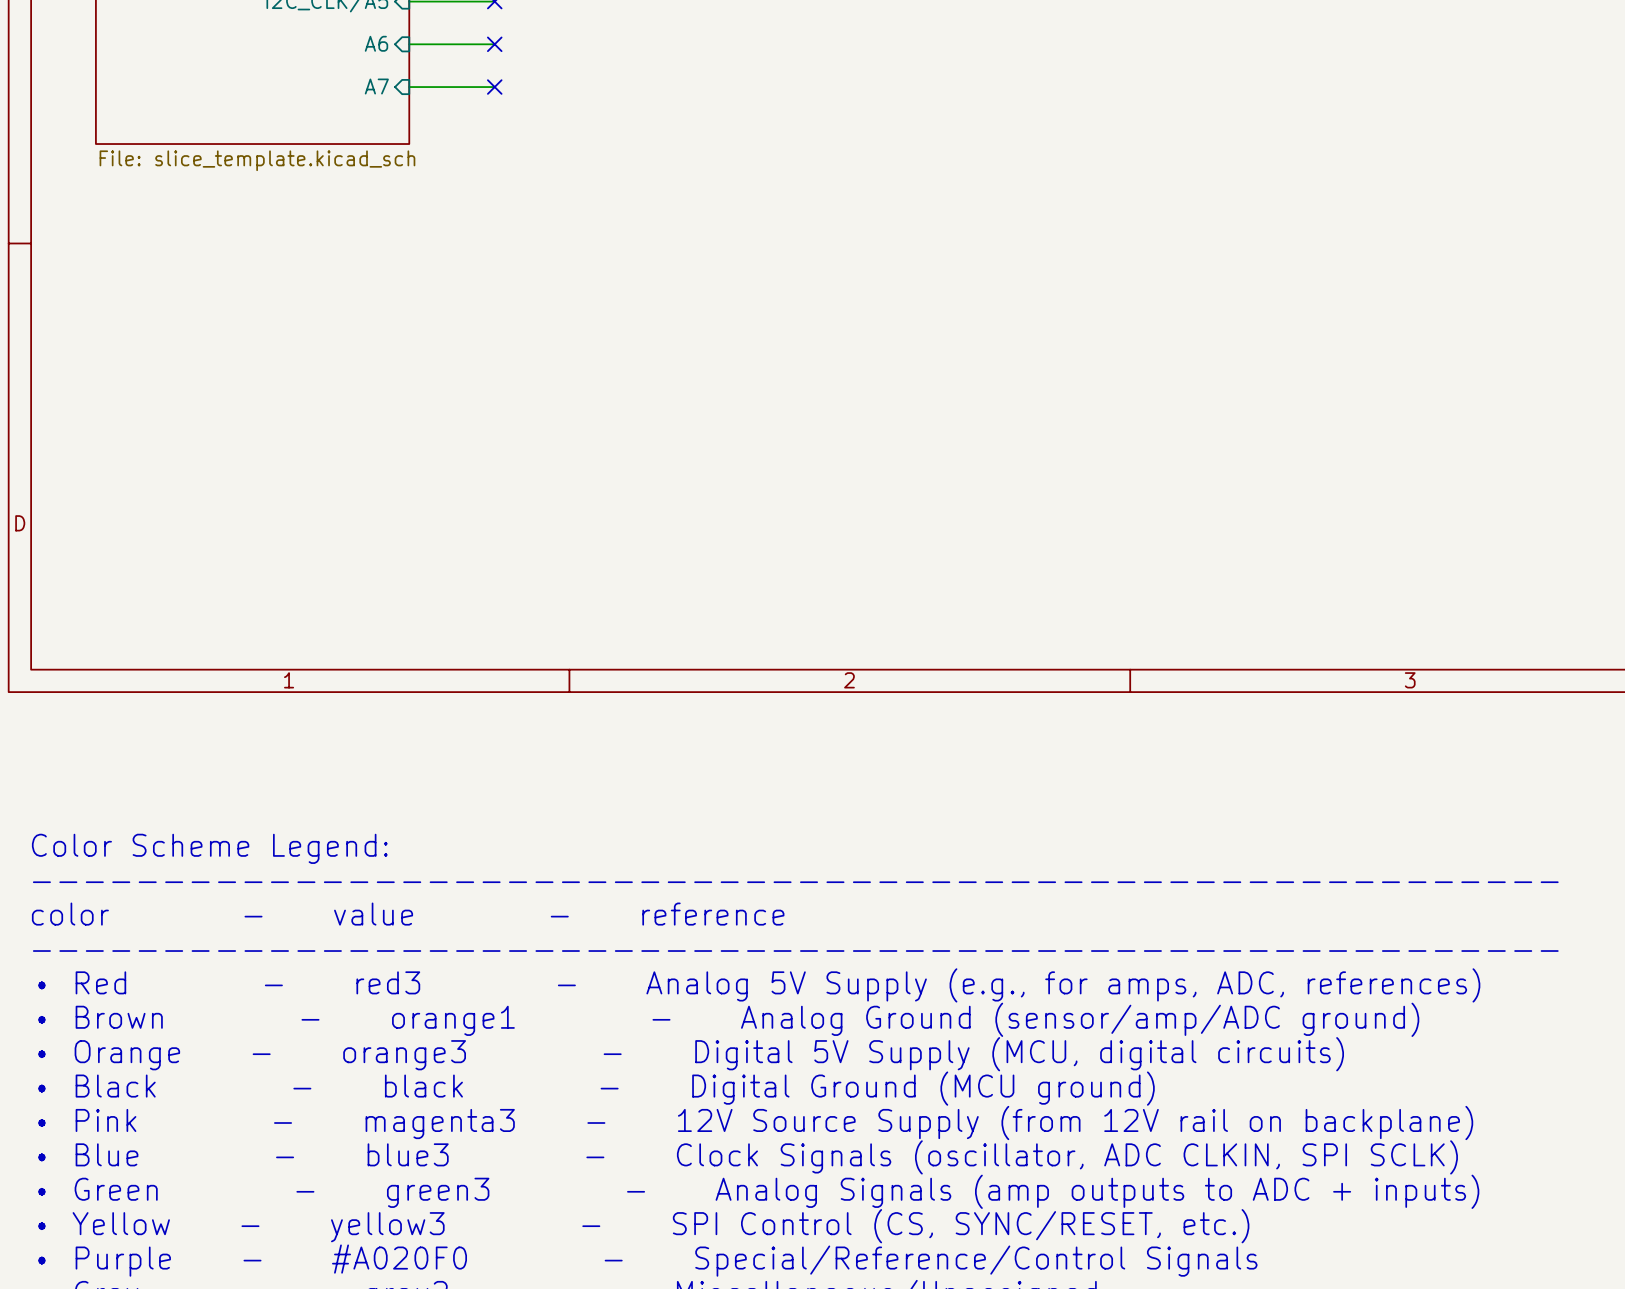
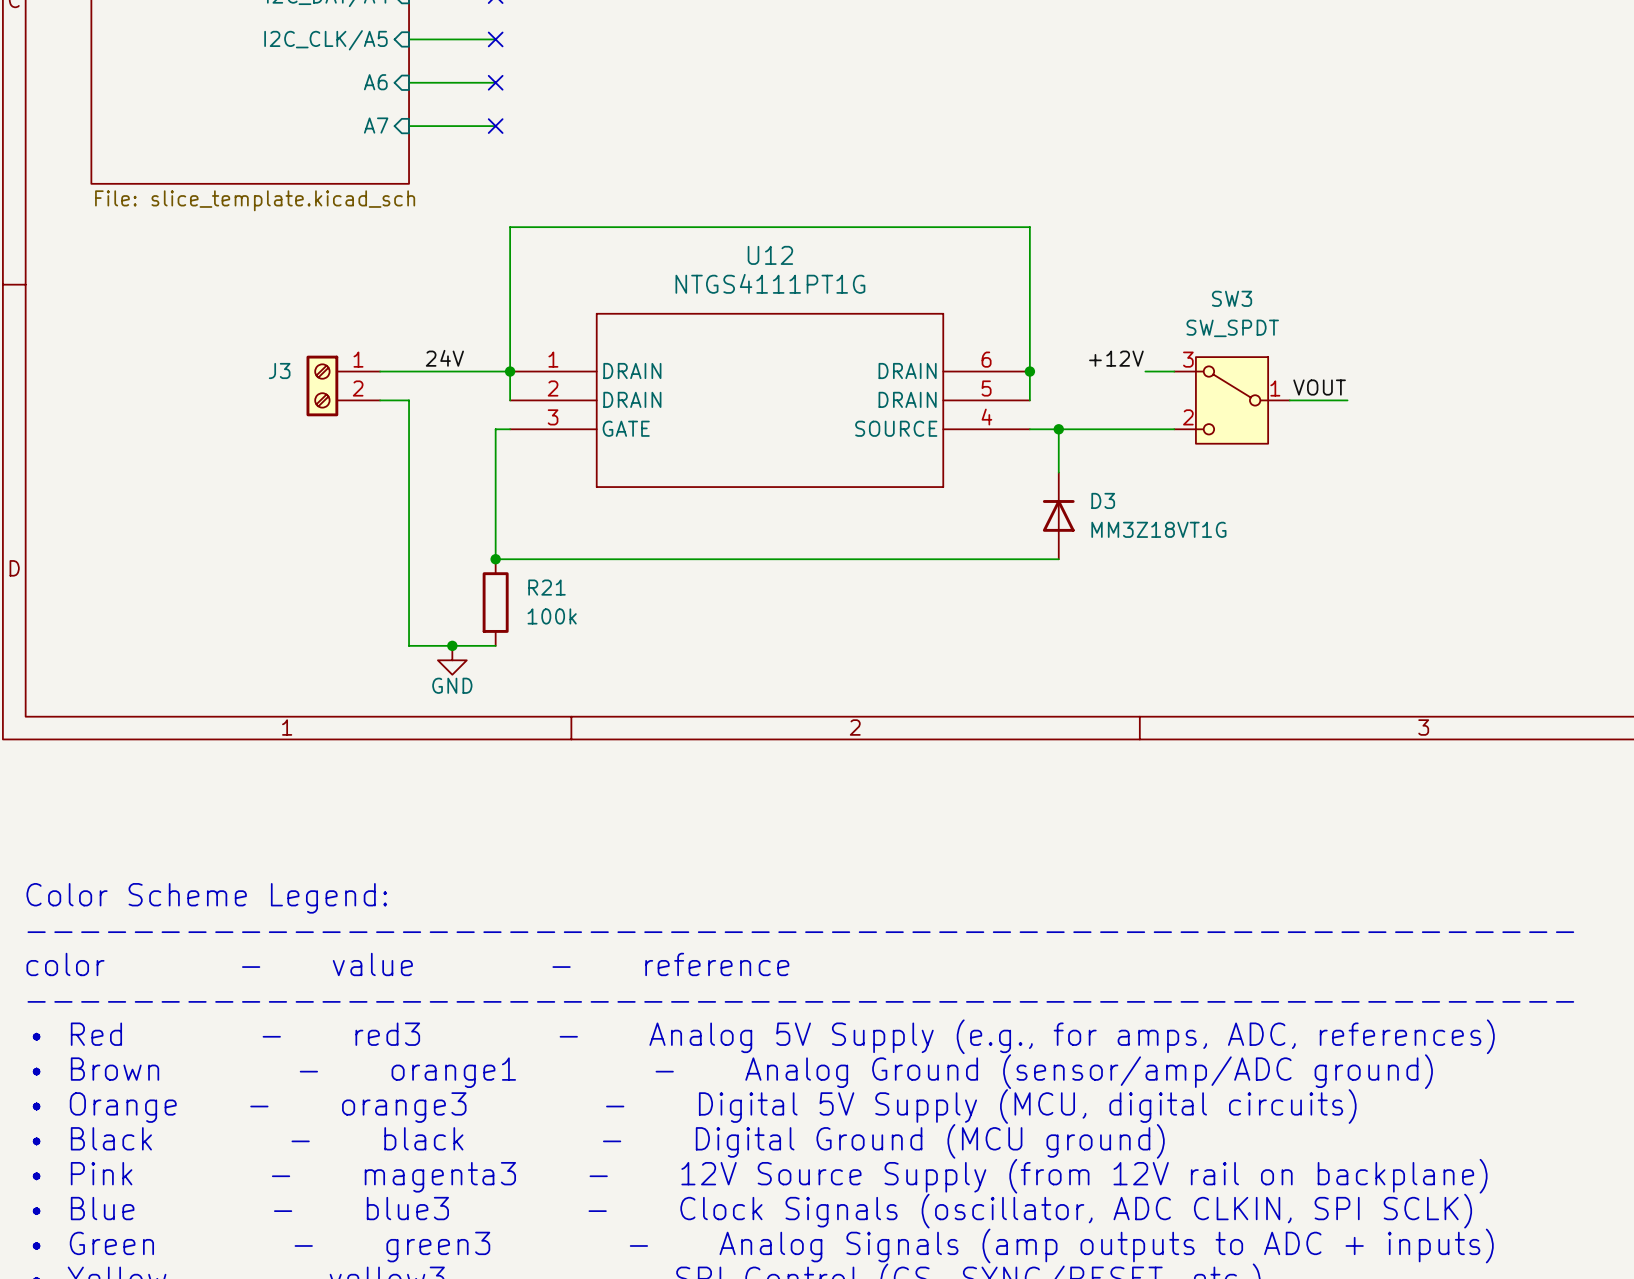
label: none -> 24V (444, 358)
label: none -> +12V (1116, 358)
wire: none -> (380, 371) (510, 371)
junction: none -> (510, 371)
junction: none -> (1029, 371)
wire: none -> (1145, 371) (1174, 371)
J3: none -> (343, 385)
label: none -> VOUT (1319, 387)
wire: none -> (380, 400) (409, 400) (409, 645) (495, 645)
wire: none -> (510, 400) (510, 227) (1029, 227) (1029, 400)
U12: none -> NTGS4111PT1G (769, 400)
SW3: none -> SW_SPDT (1232, 400)
wire: none -> (1289, 400) (1347, 400)
wire: none -> (510, 429) (495, 429) (495, 559) (1058, 559)
wire: none -> (1029, 429) (1174, 429)
wire: none -> (1058, 429) (1058, 472)
junction: none -> (1058, 429)
D3: none -> MM3Z18VT1G (1058, 515)
junction: none -> (495, 559)
R21: none -> 100k (495, 602)
junction: none -> (452, 645)
power symbol: none -> GND (452, 660)

